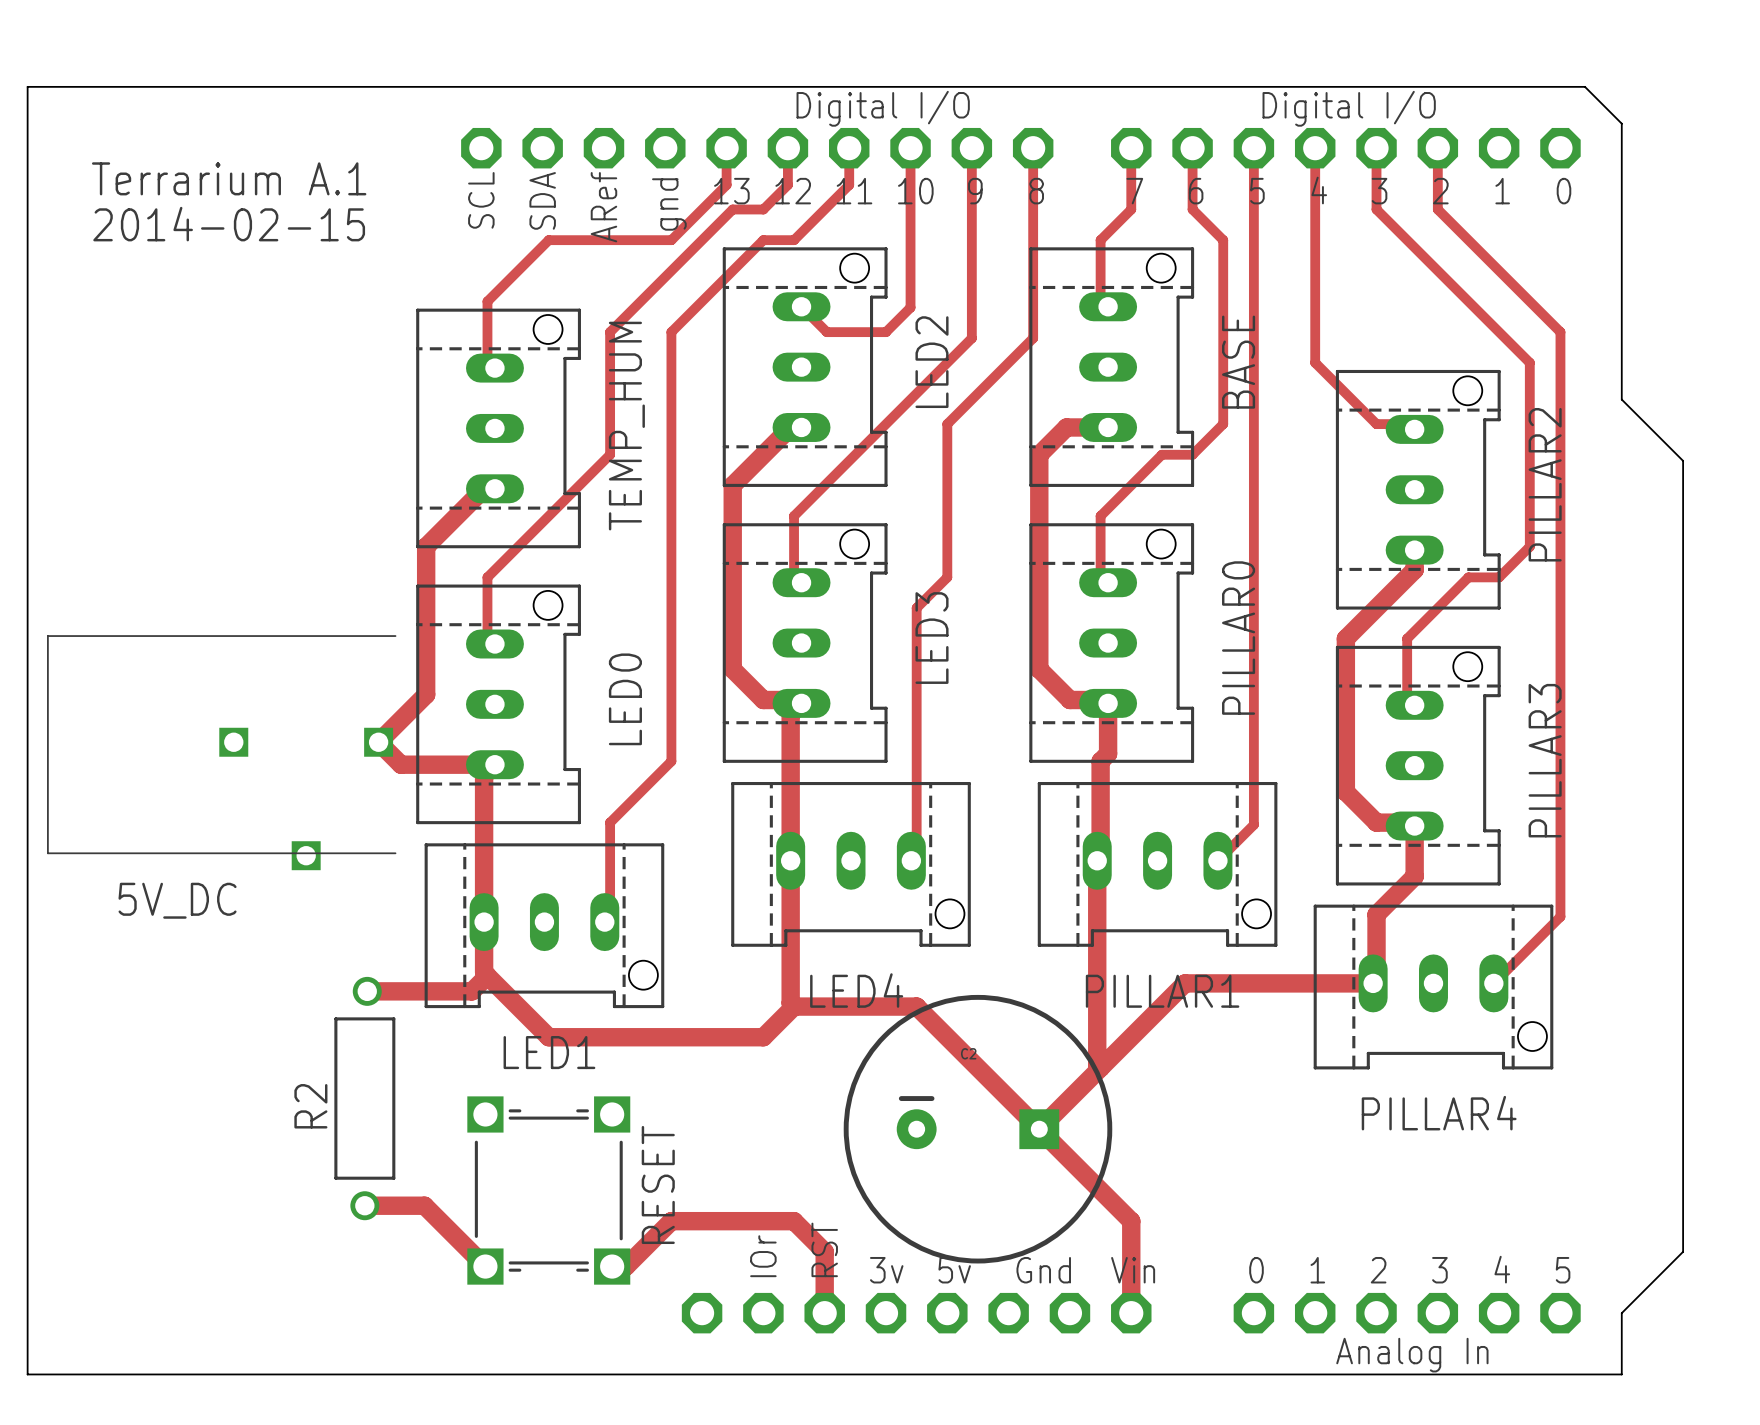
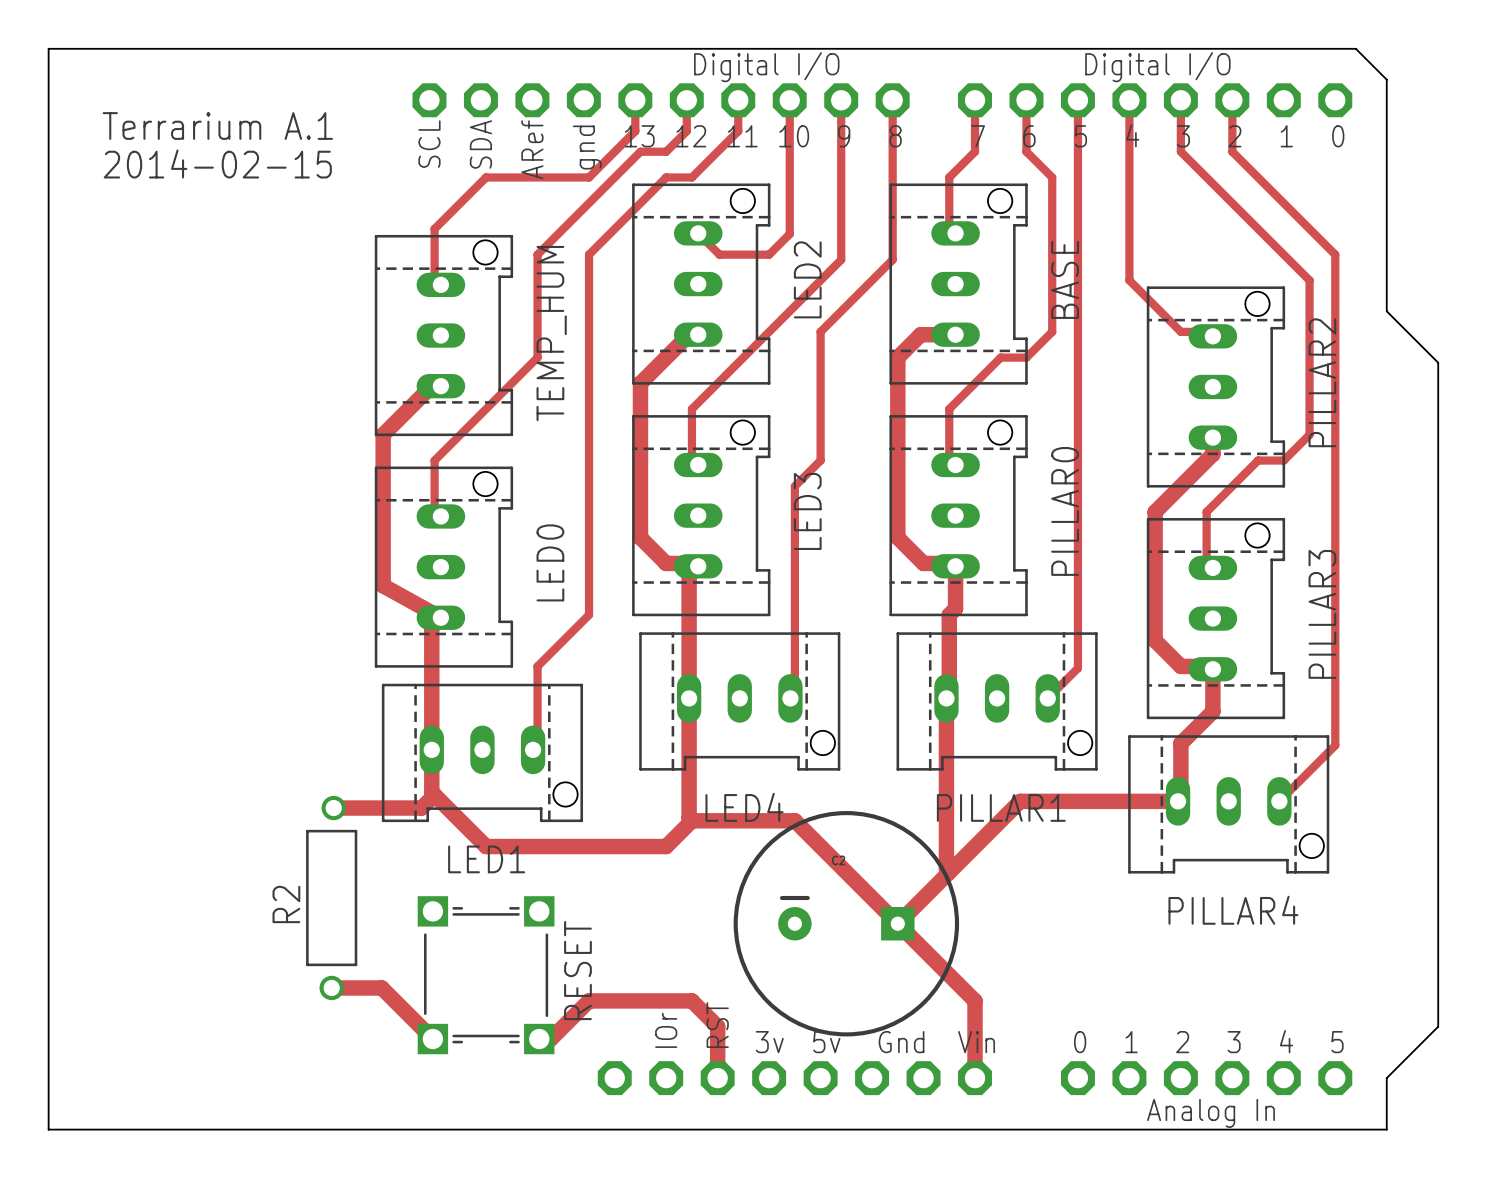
track: (426, 694) (378, 742) (401, 764) (494, 764) -> (383, 559) (383, 585) (440, 617)
5V_DC: (221, 753) -> none

